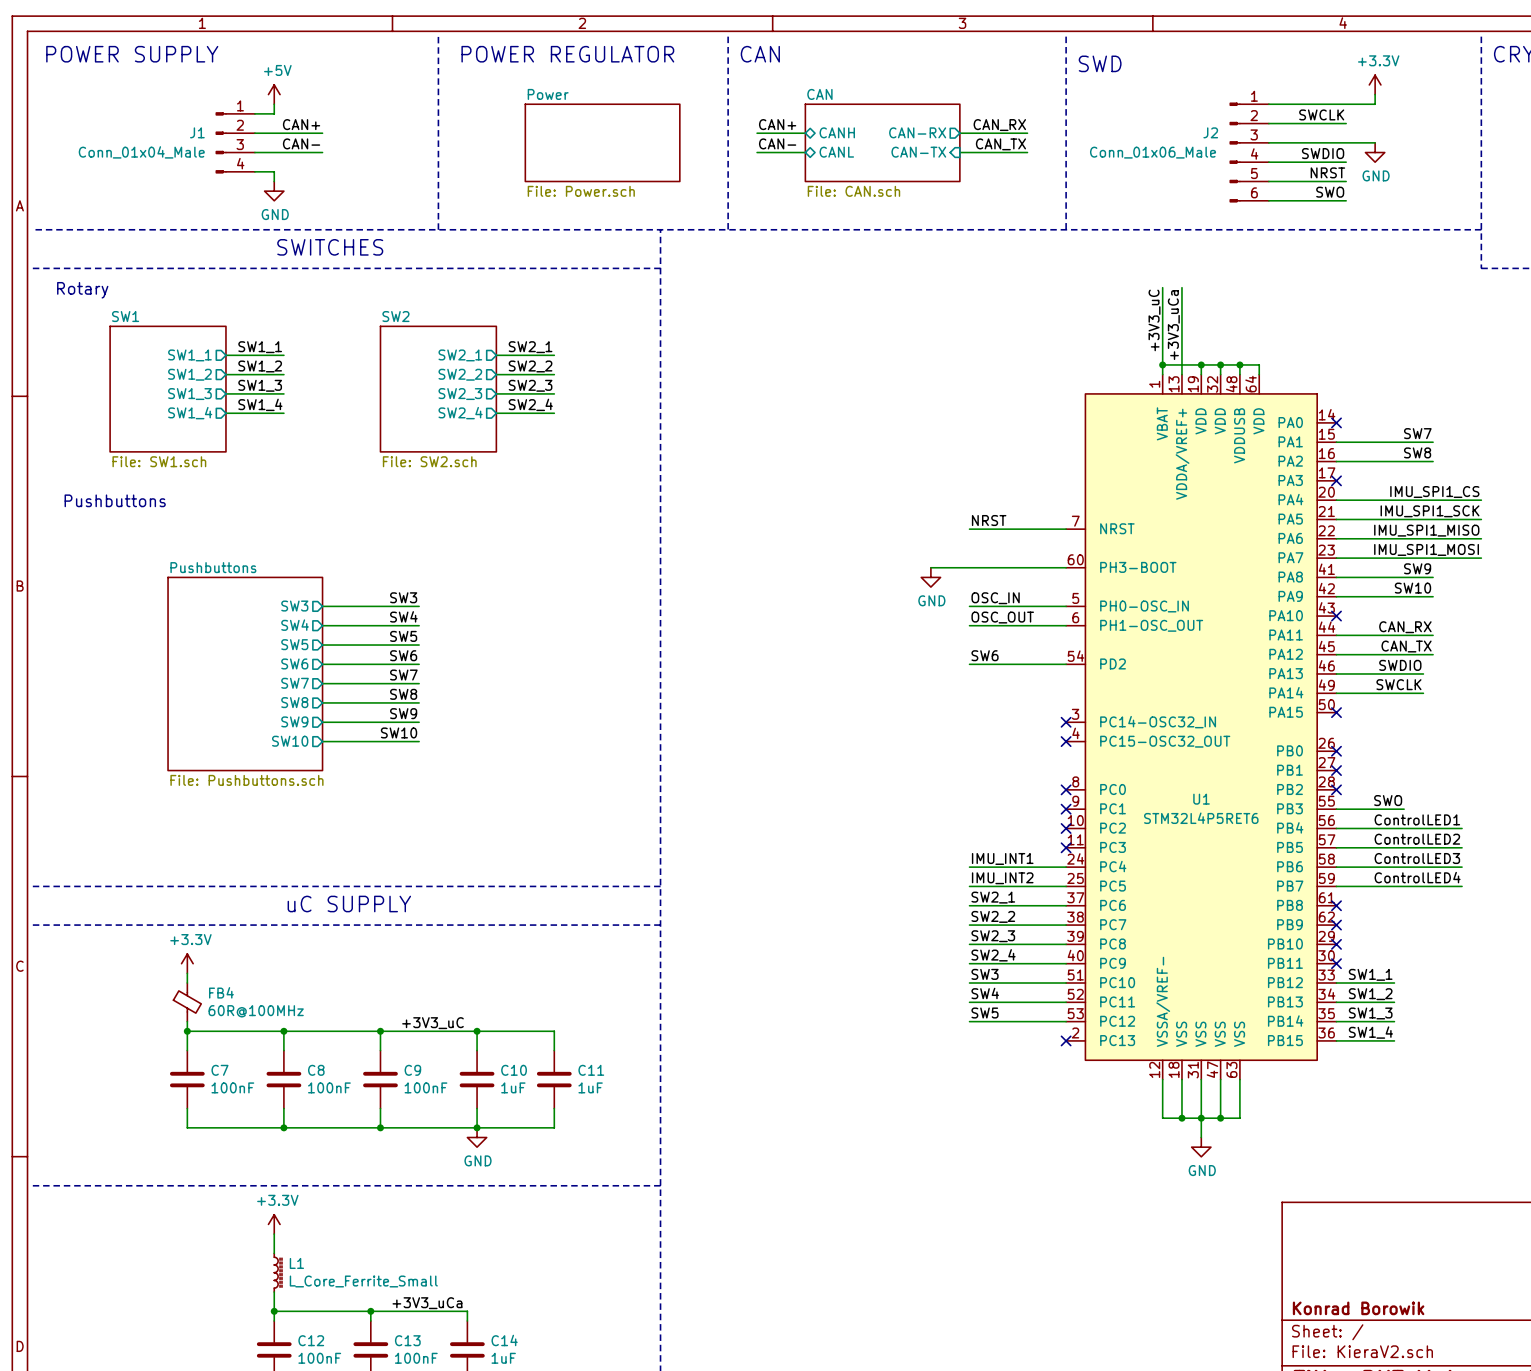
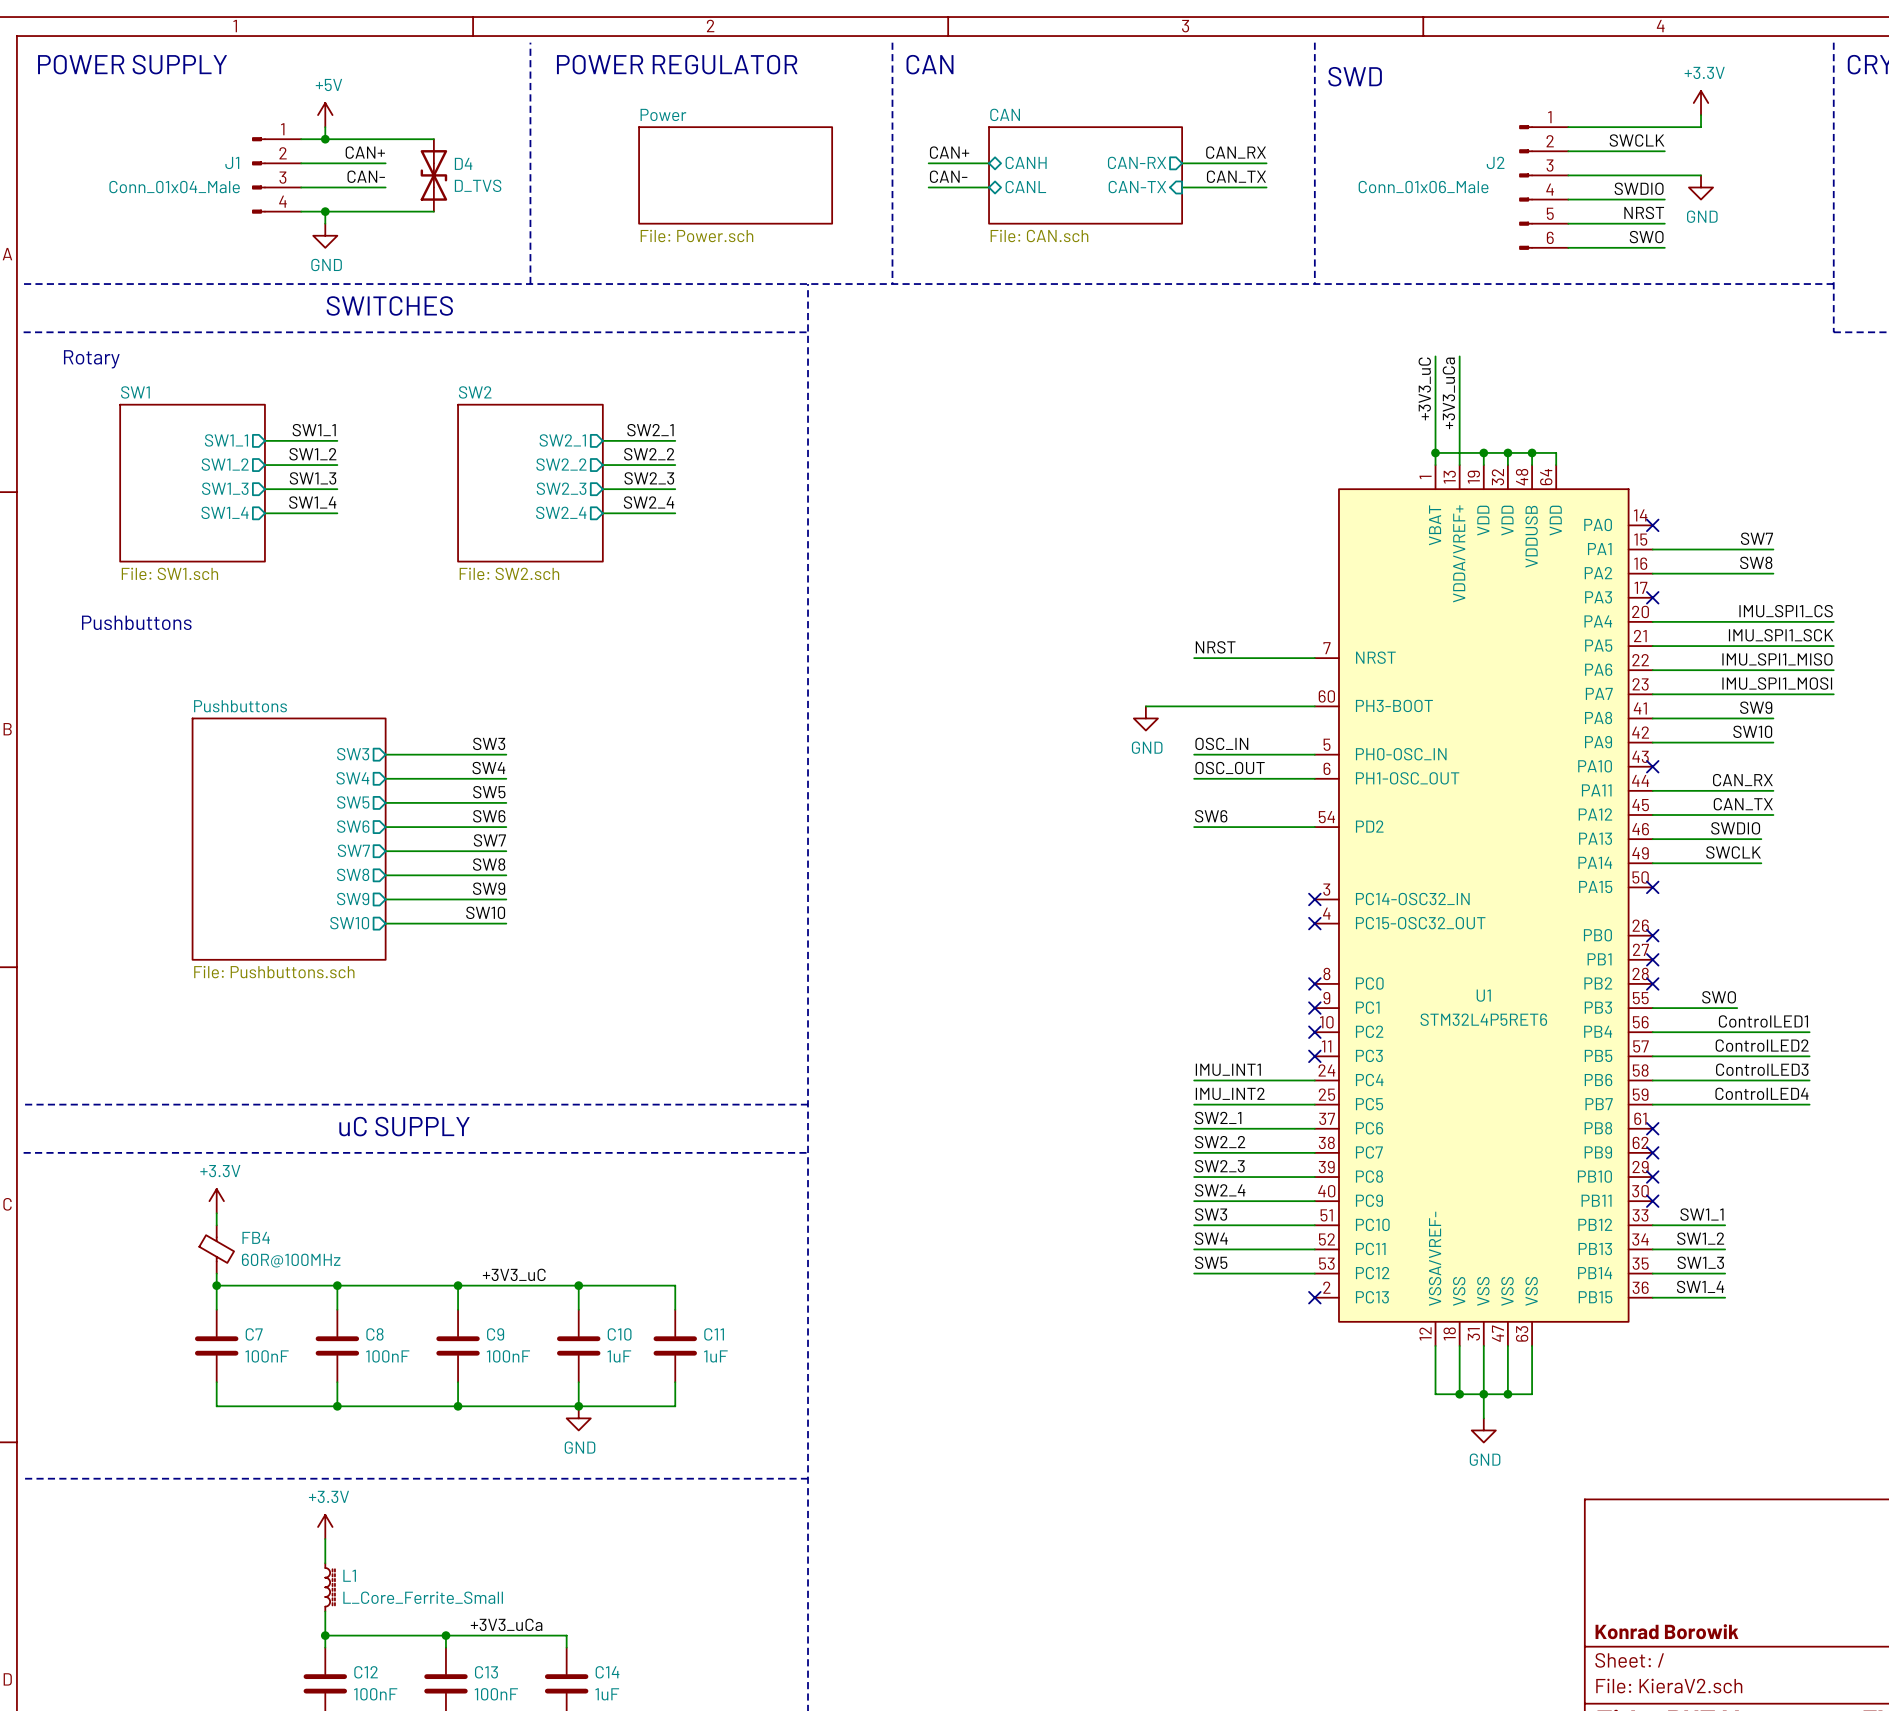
wire: none -> (325, 139) (433, 139)
junction: none -> (325, 139)
D4: none -> D_TVS (433, 175)
wire: none -> (325, 211) (433, 211)
junction: none -> (325, 211)

